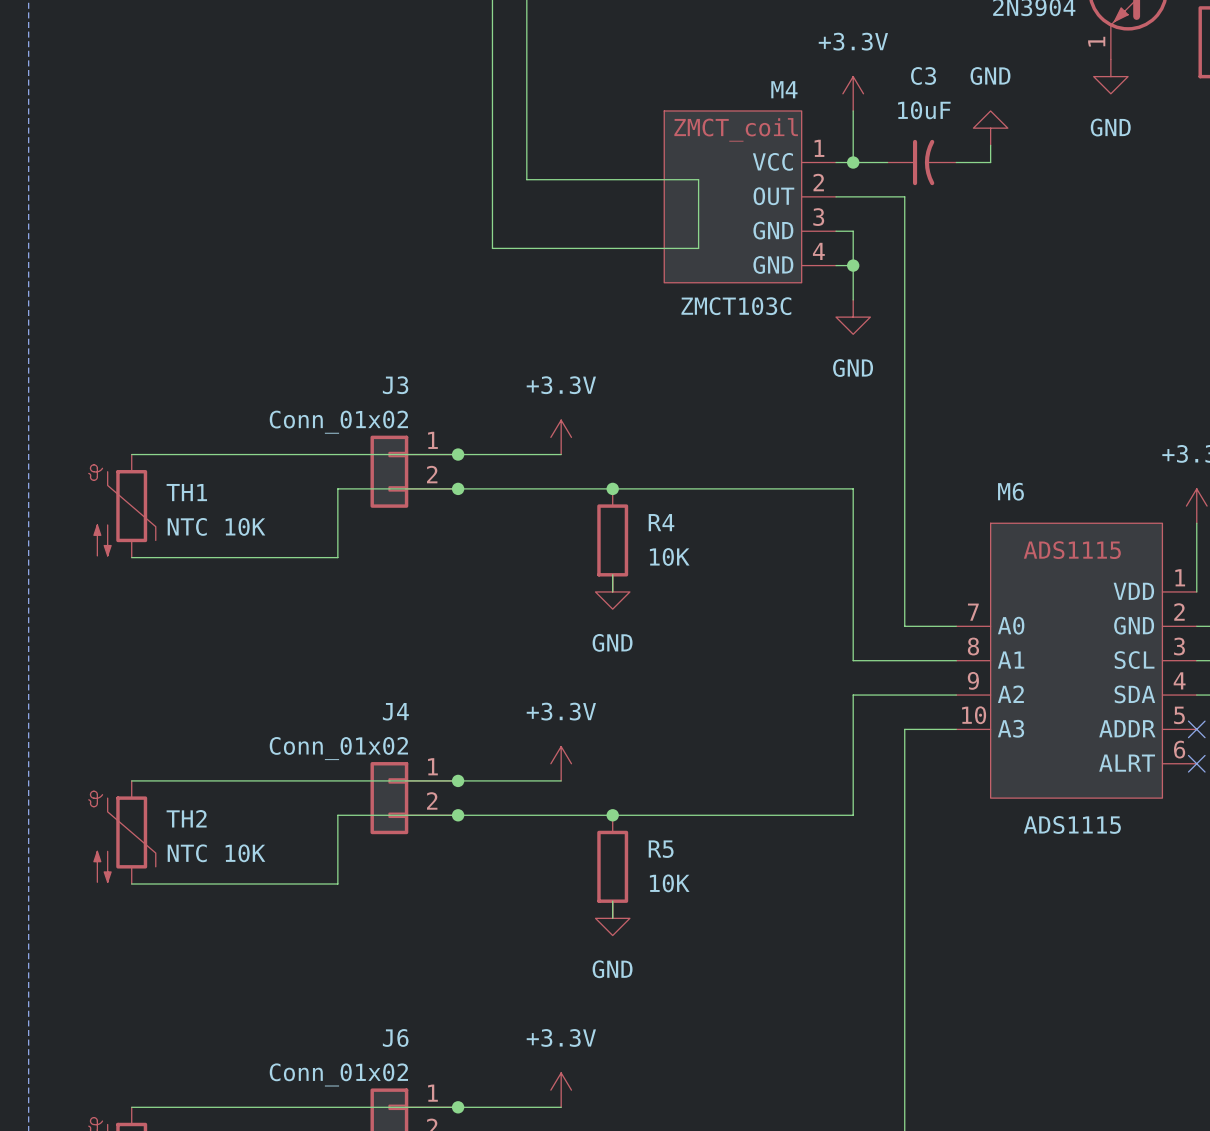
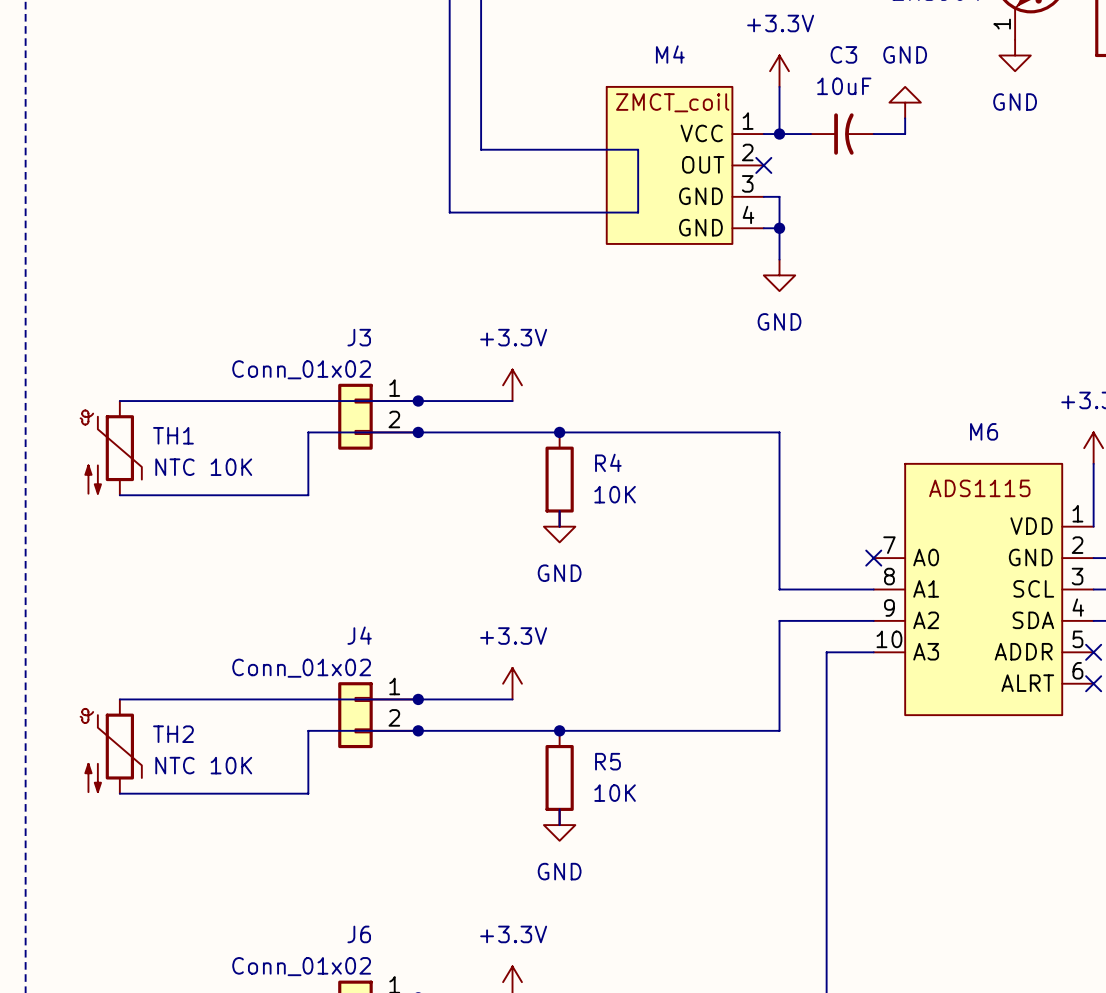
M4 name position: M4 (784, 89) -> M4 (670, 54)
wire: (836, 196) (904, 196) (904, 626) (956, 626) -> none
no-connect mark: none -> (763, 165)
M4 value: ZMCT103C (736, 306) -> none
M6 name position: M6 (1010, 491) -> M6 (984, 431)
no-connect mark: none -> (873, 558)
M6 value: ADS1115 (1072, 824) -> none

